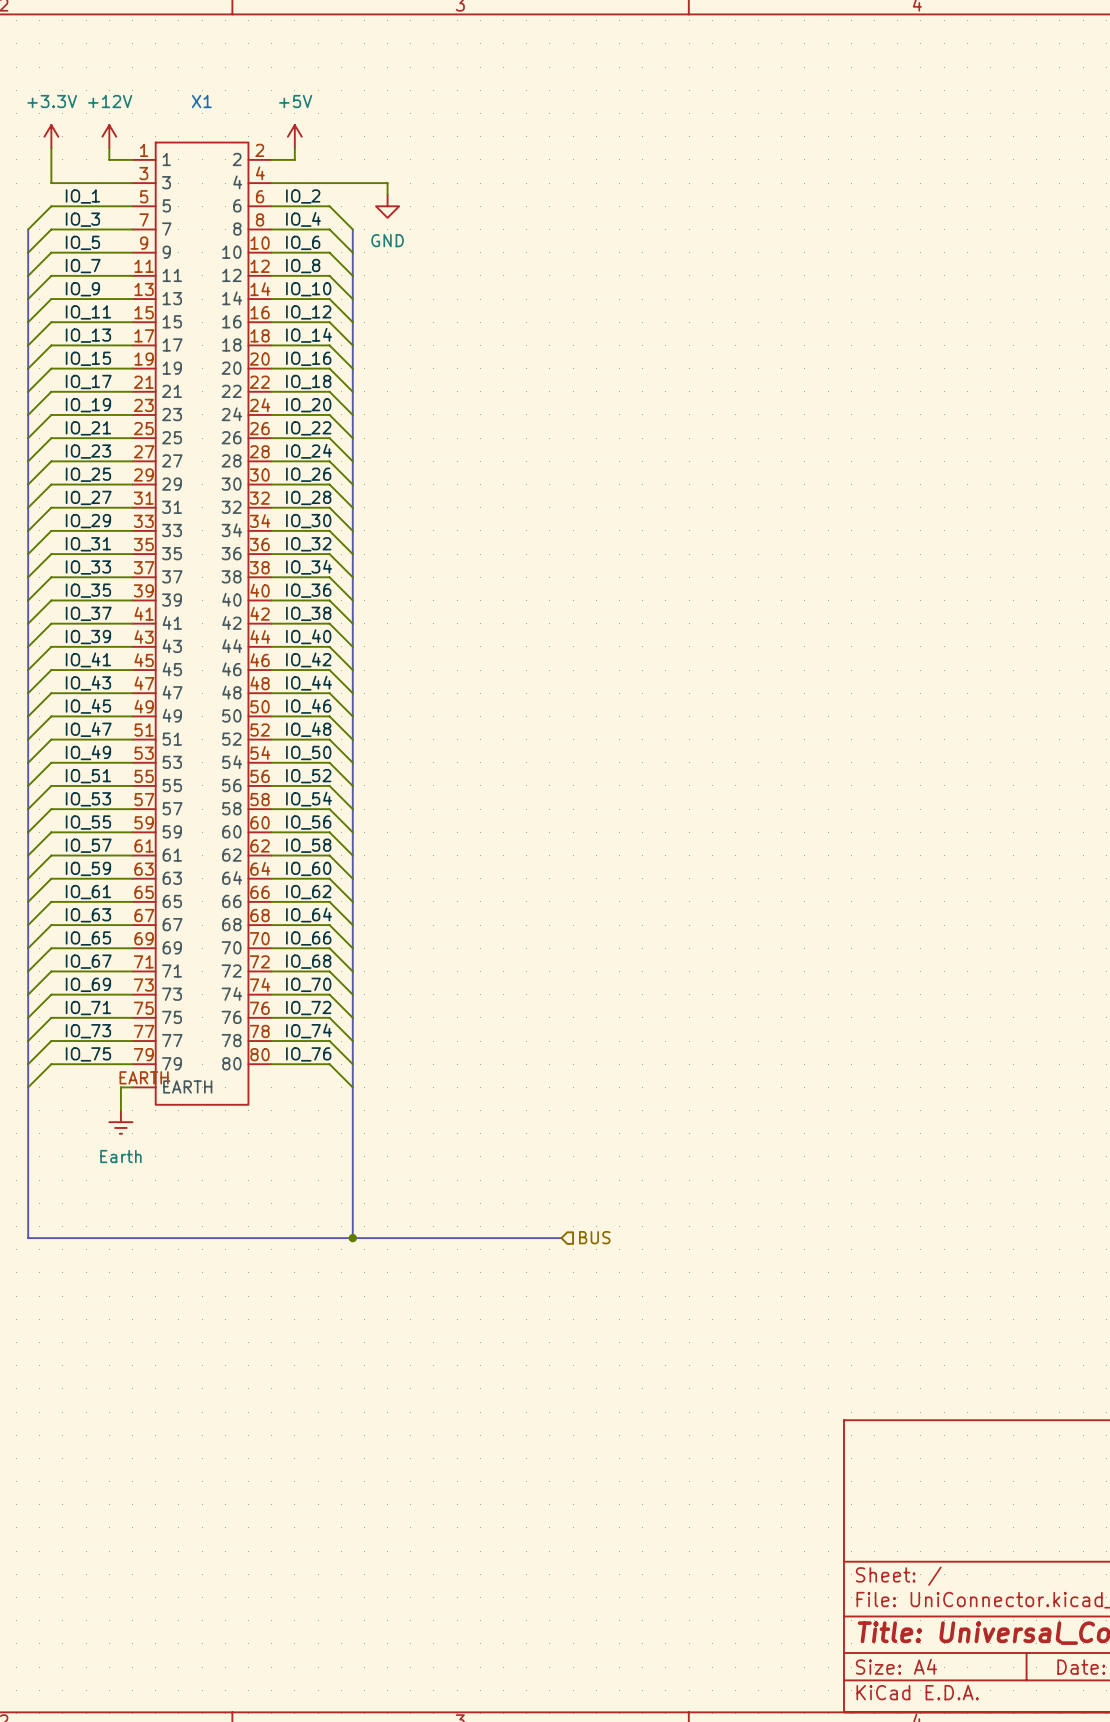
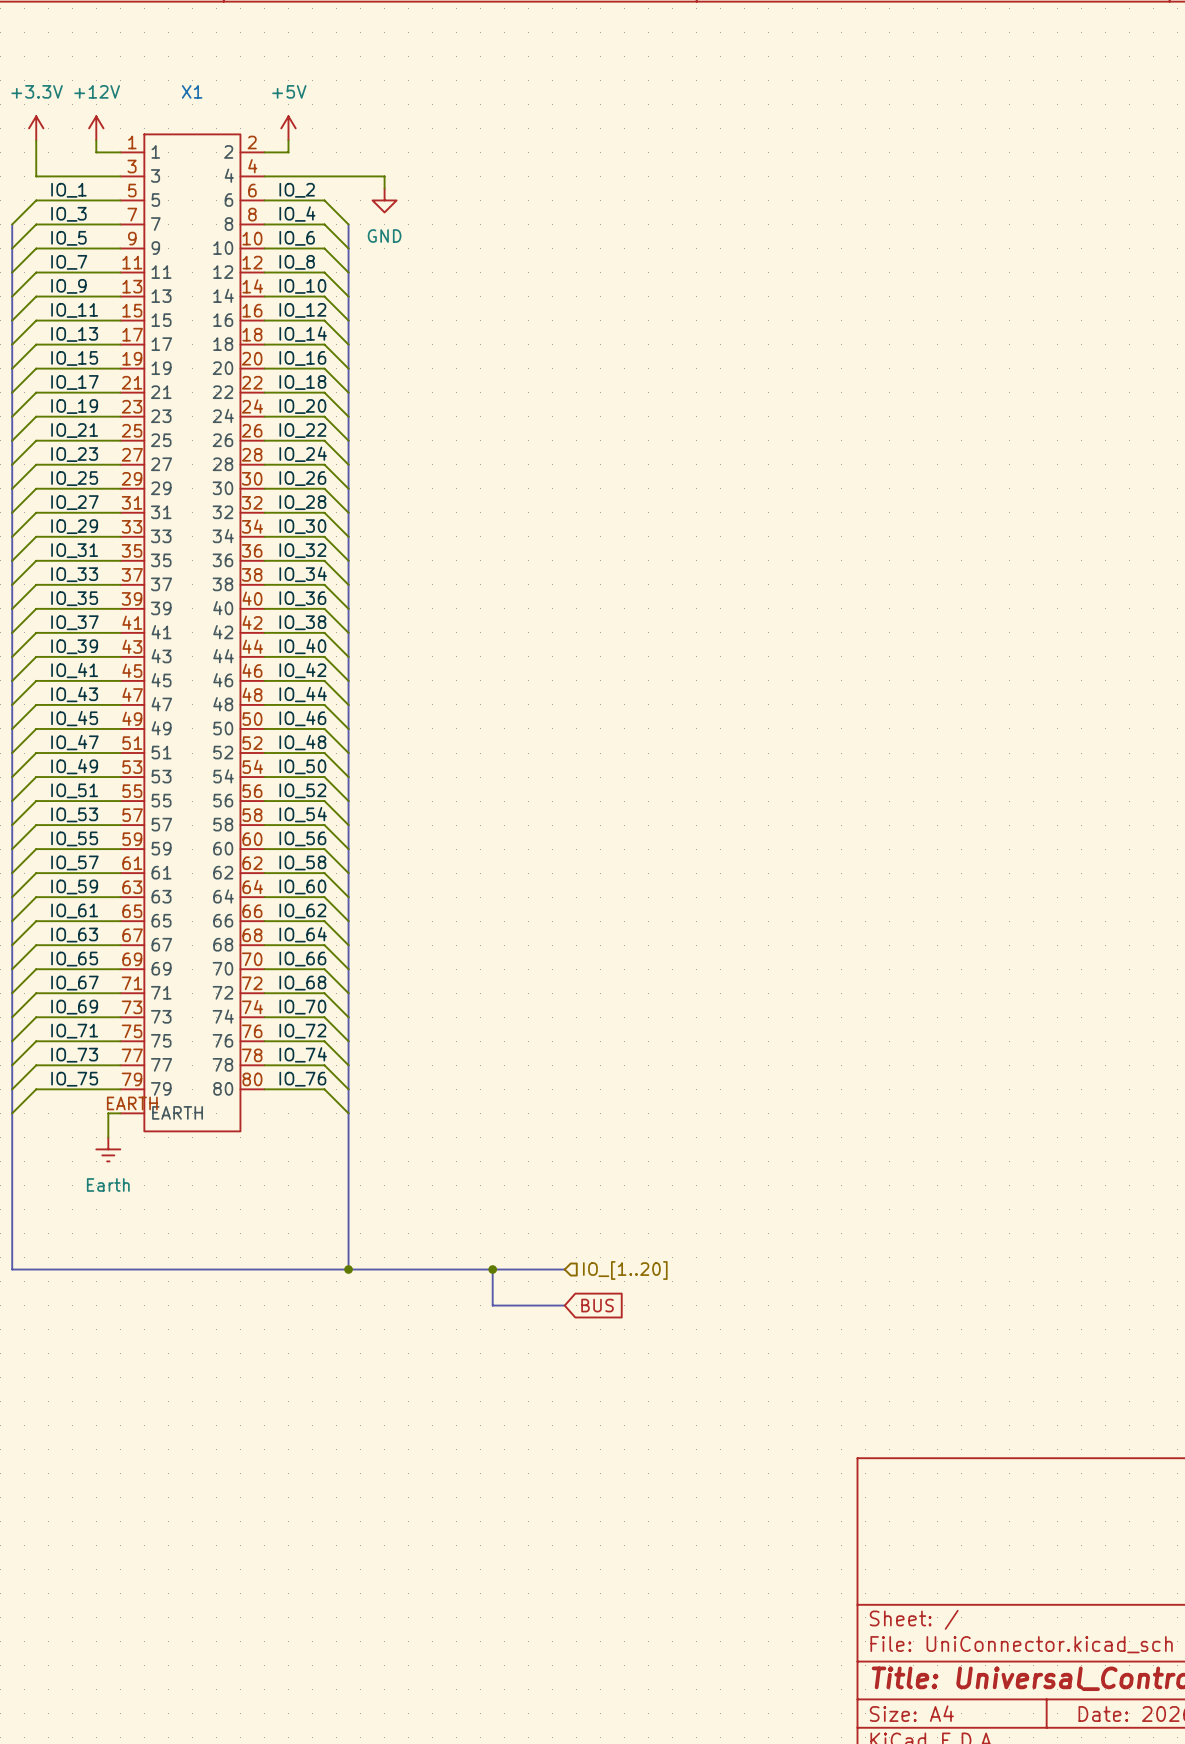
hierarchical label: BUS (594, 1237) -> IO_[1..20] (625, 1270)
bus: none -> (492, 1269) (492, 1305) (564, 1305)
junction: none -> (492, 1269)
global label: none -> BUS (597, 1305)

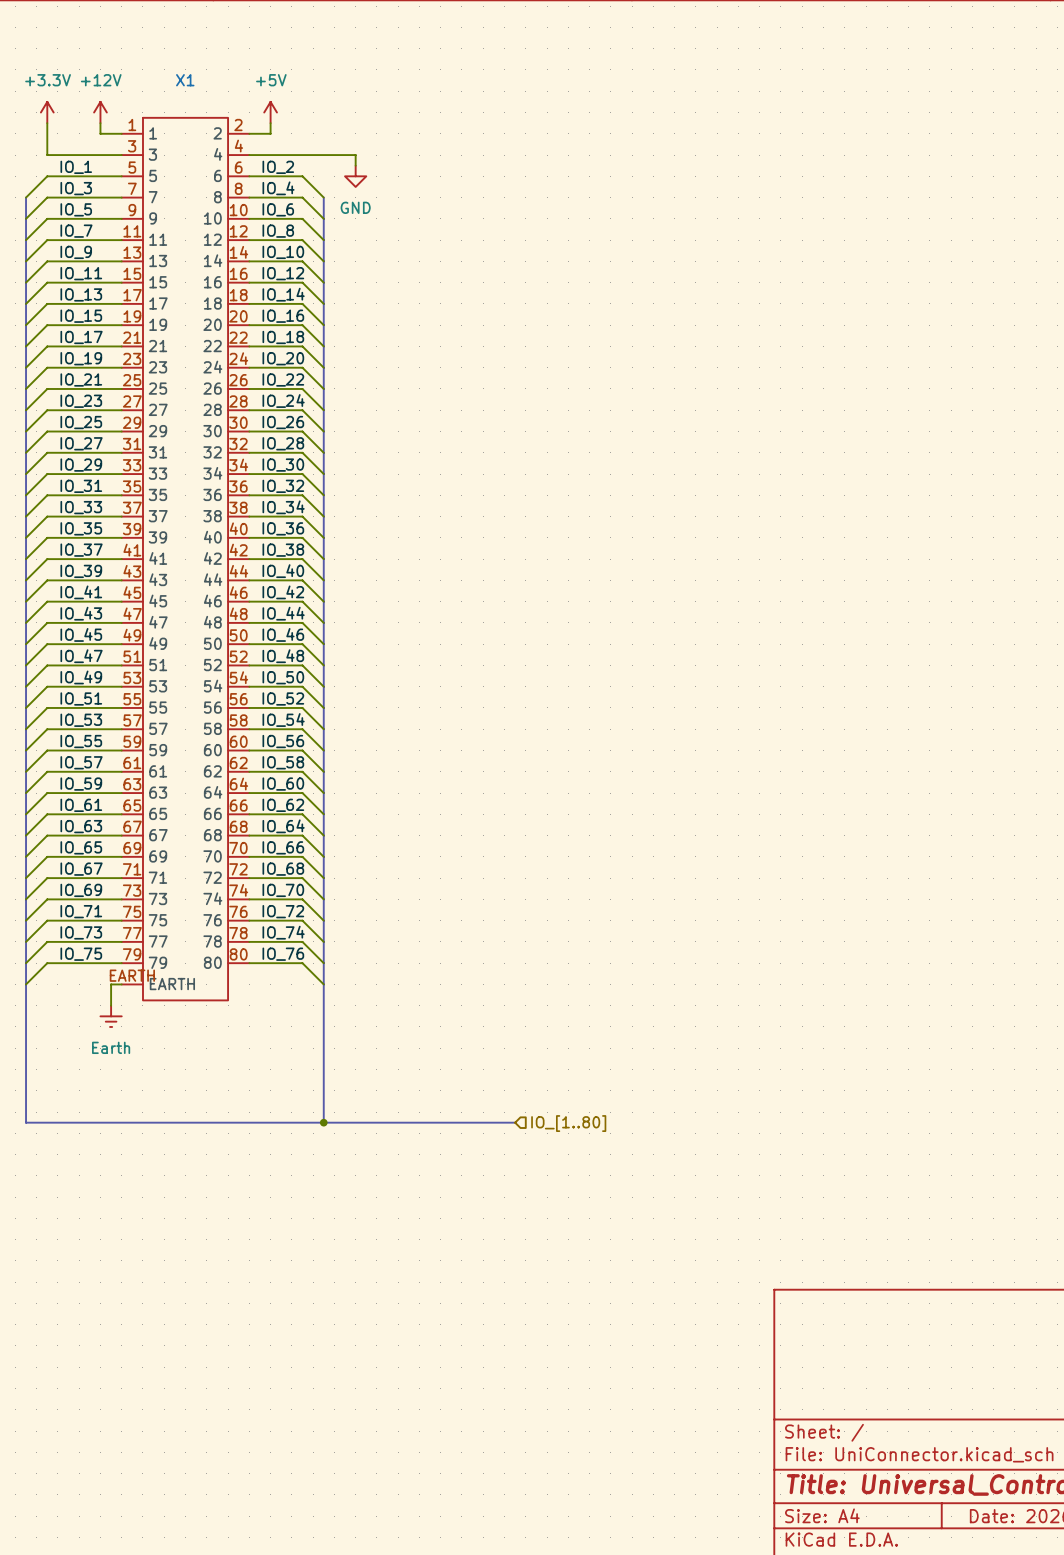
bus: (492, 1269) (492, 1305) (564, 1305) -> none
junction: (492, 1269) -> none
hierarchical label: IO_[1..20] (625, 1270) -> IO_[1..80] (568, 1123)
global label: BUS (597, 1305) -> none

